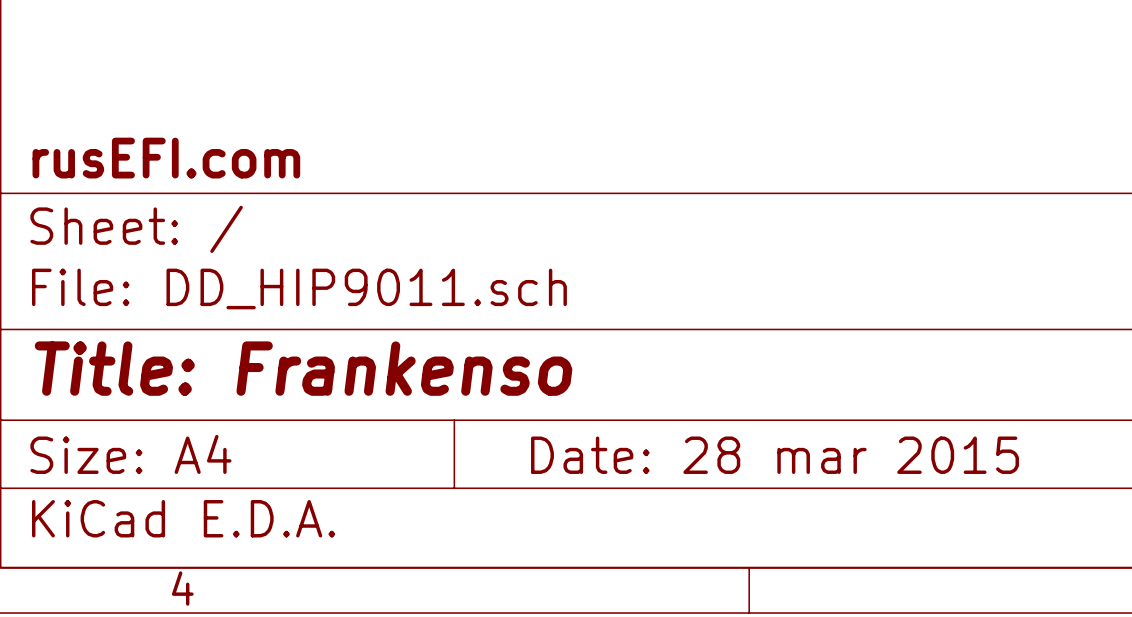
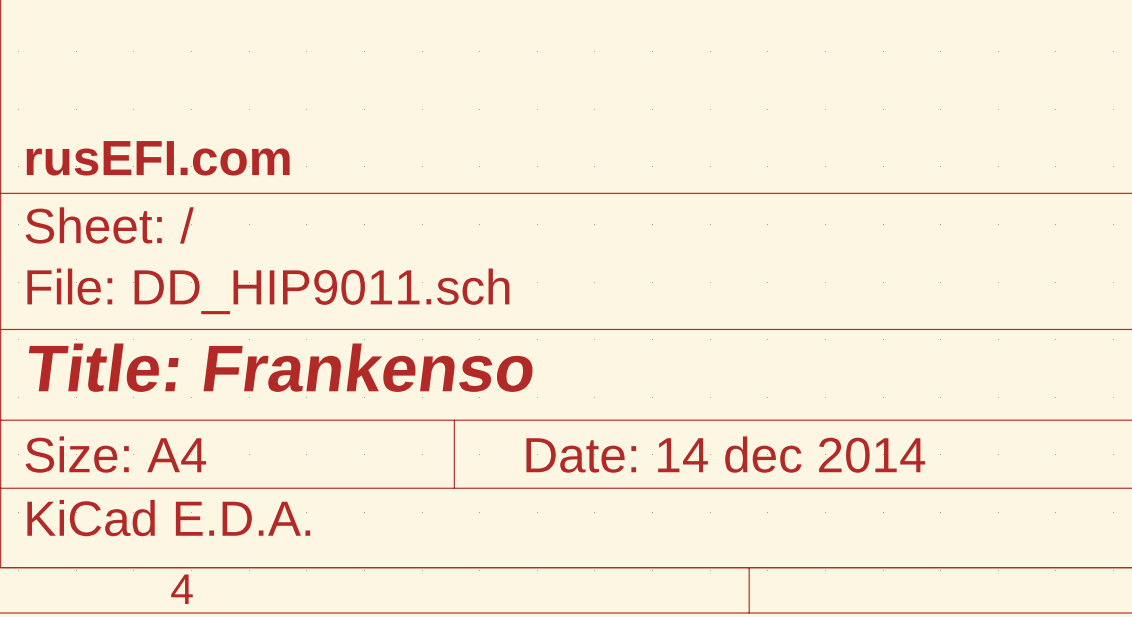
title block: Date: 28 mar 2015 (775, 455) -> Date: 14 dec 2014 (725, 454)

